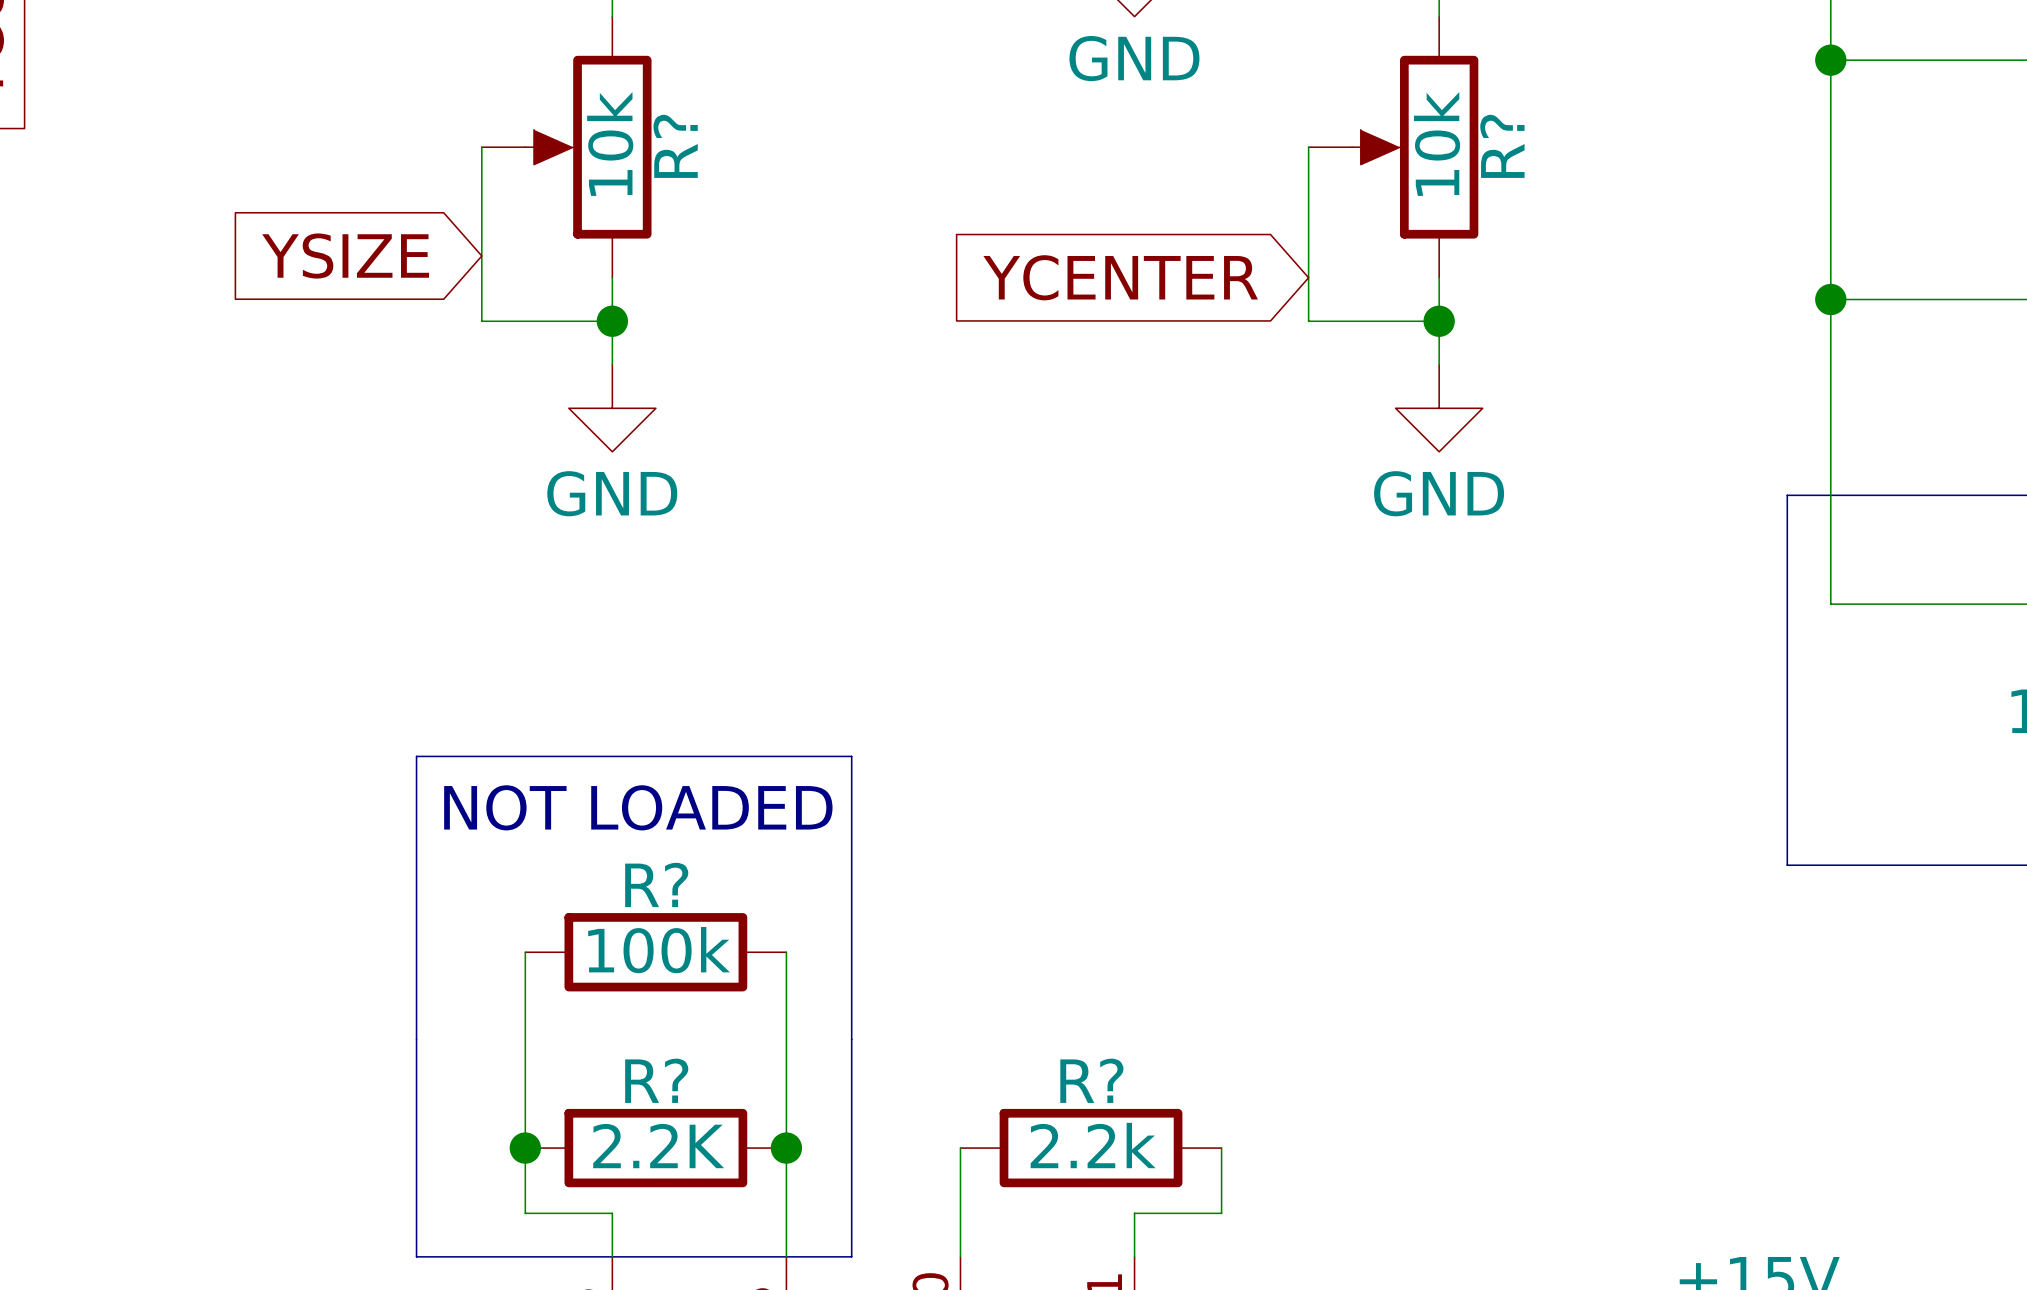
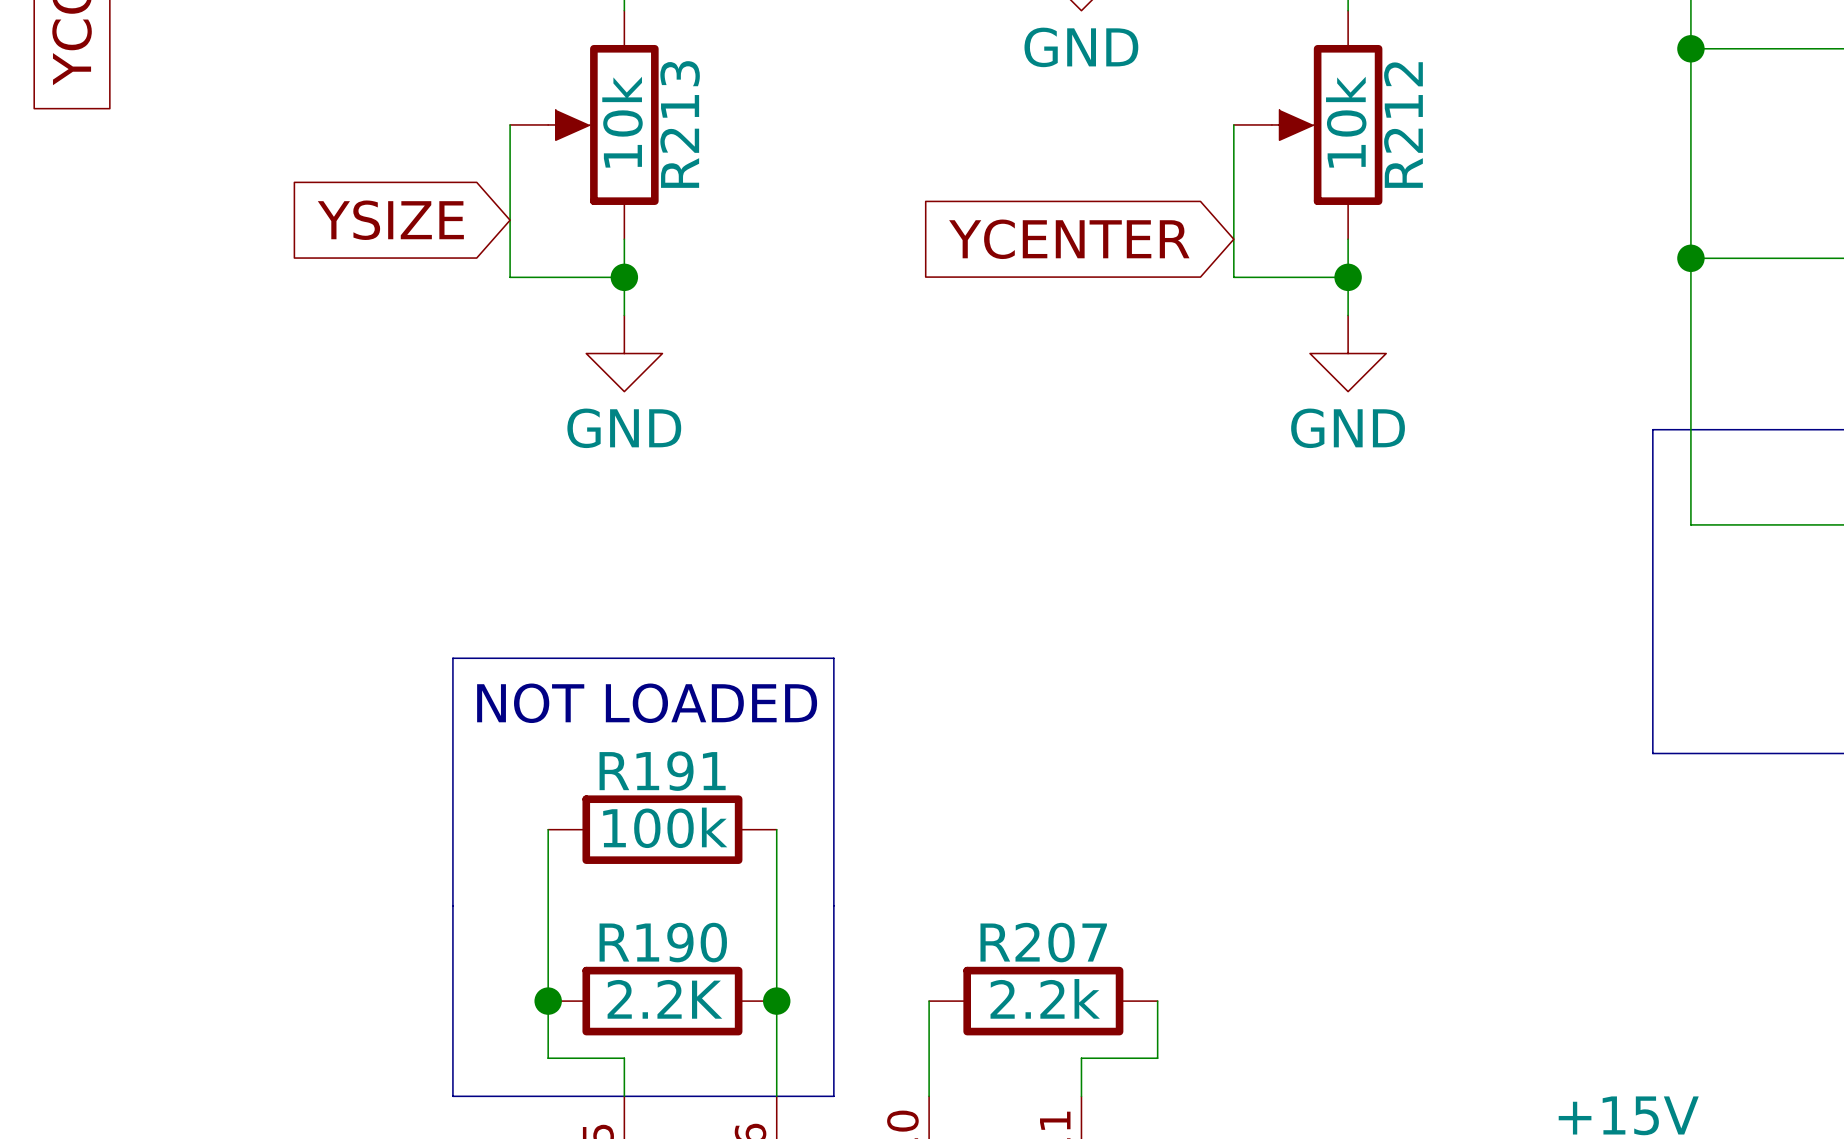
R? name: R? (675, 146) -> R213 (680, 124)
R? name: R? (1502, 146) -> R212 (1403, 125)
R? name: R? (656, 884) -> R191 (662, 771)
R? name: R? (656, 1080) -> R190 (663, 942)
R? name: R? (1091, 1080) -> R207 (1043, 942)

